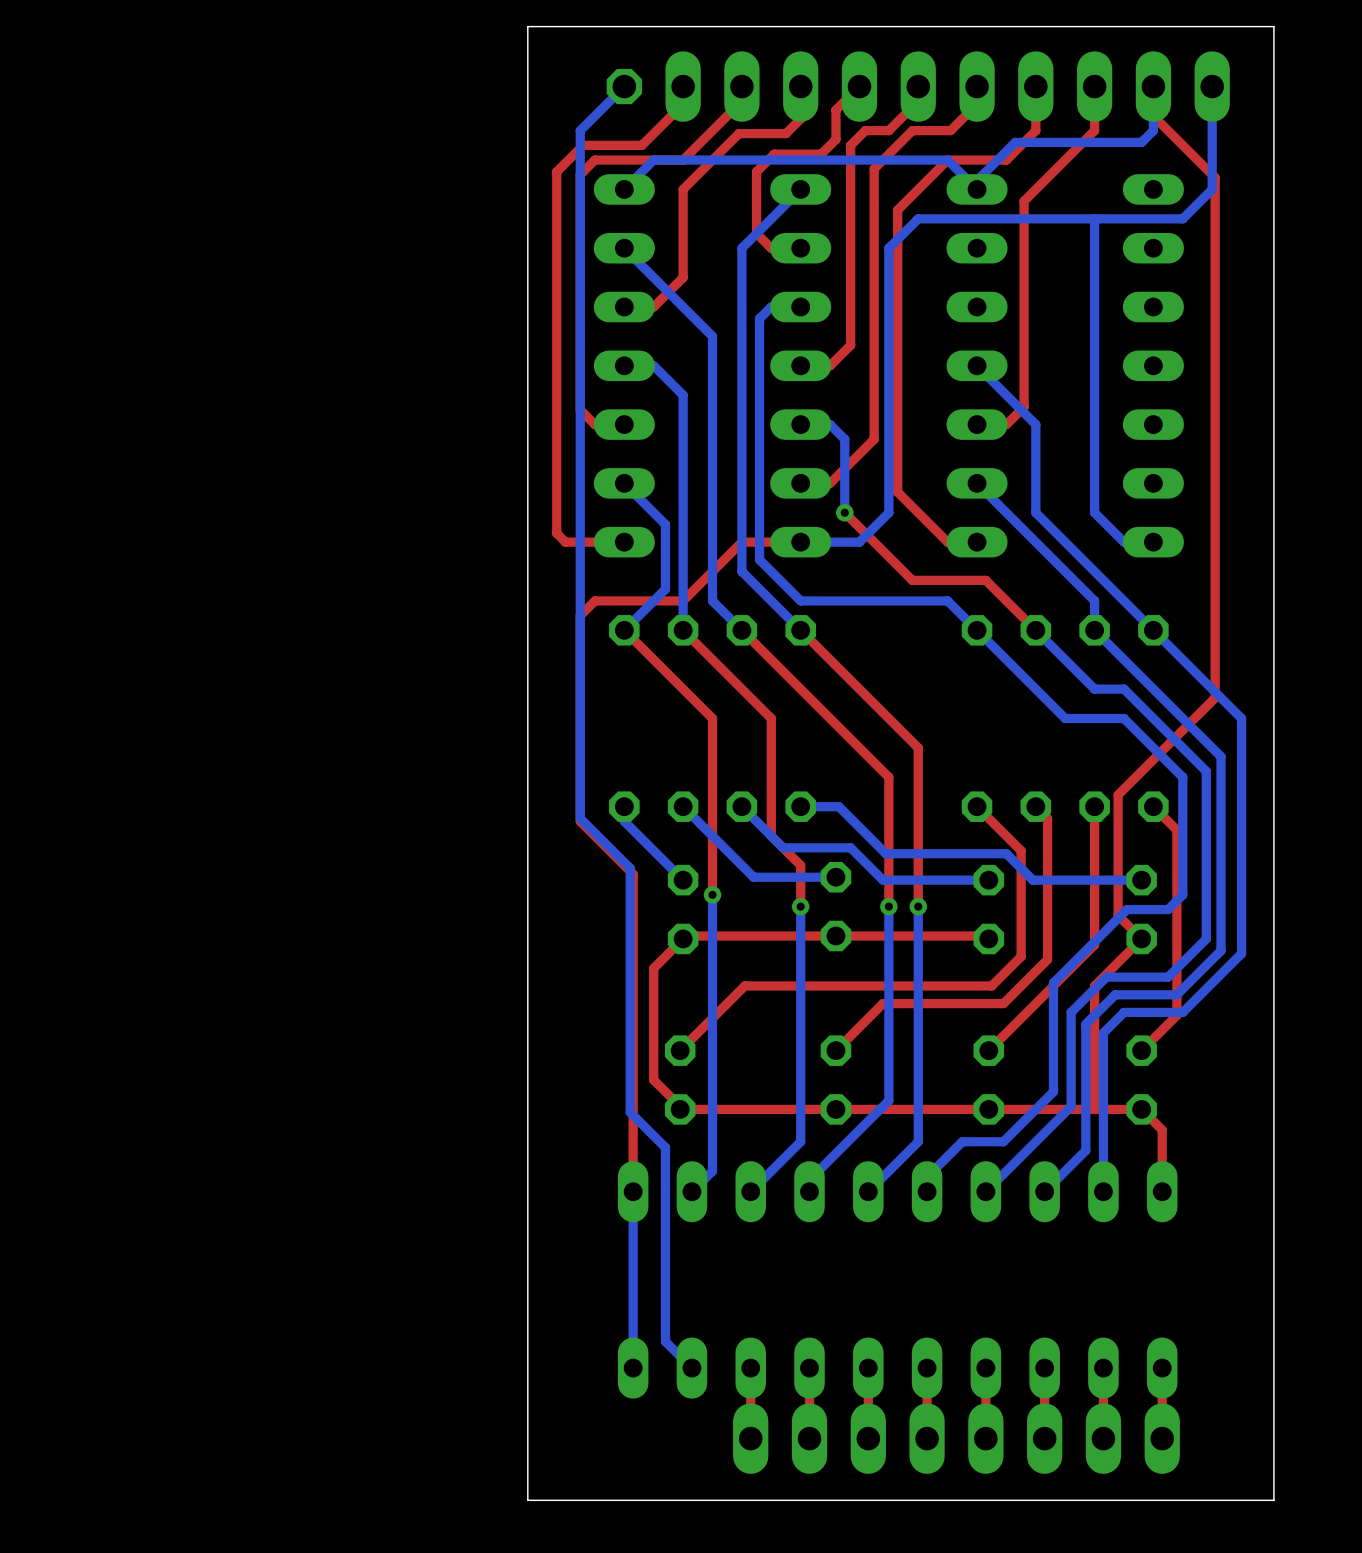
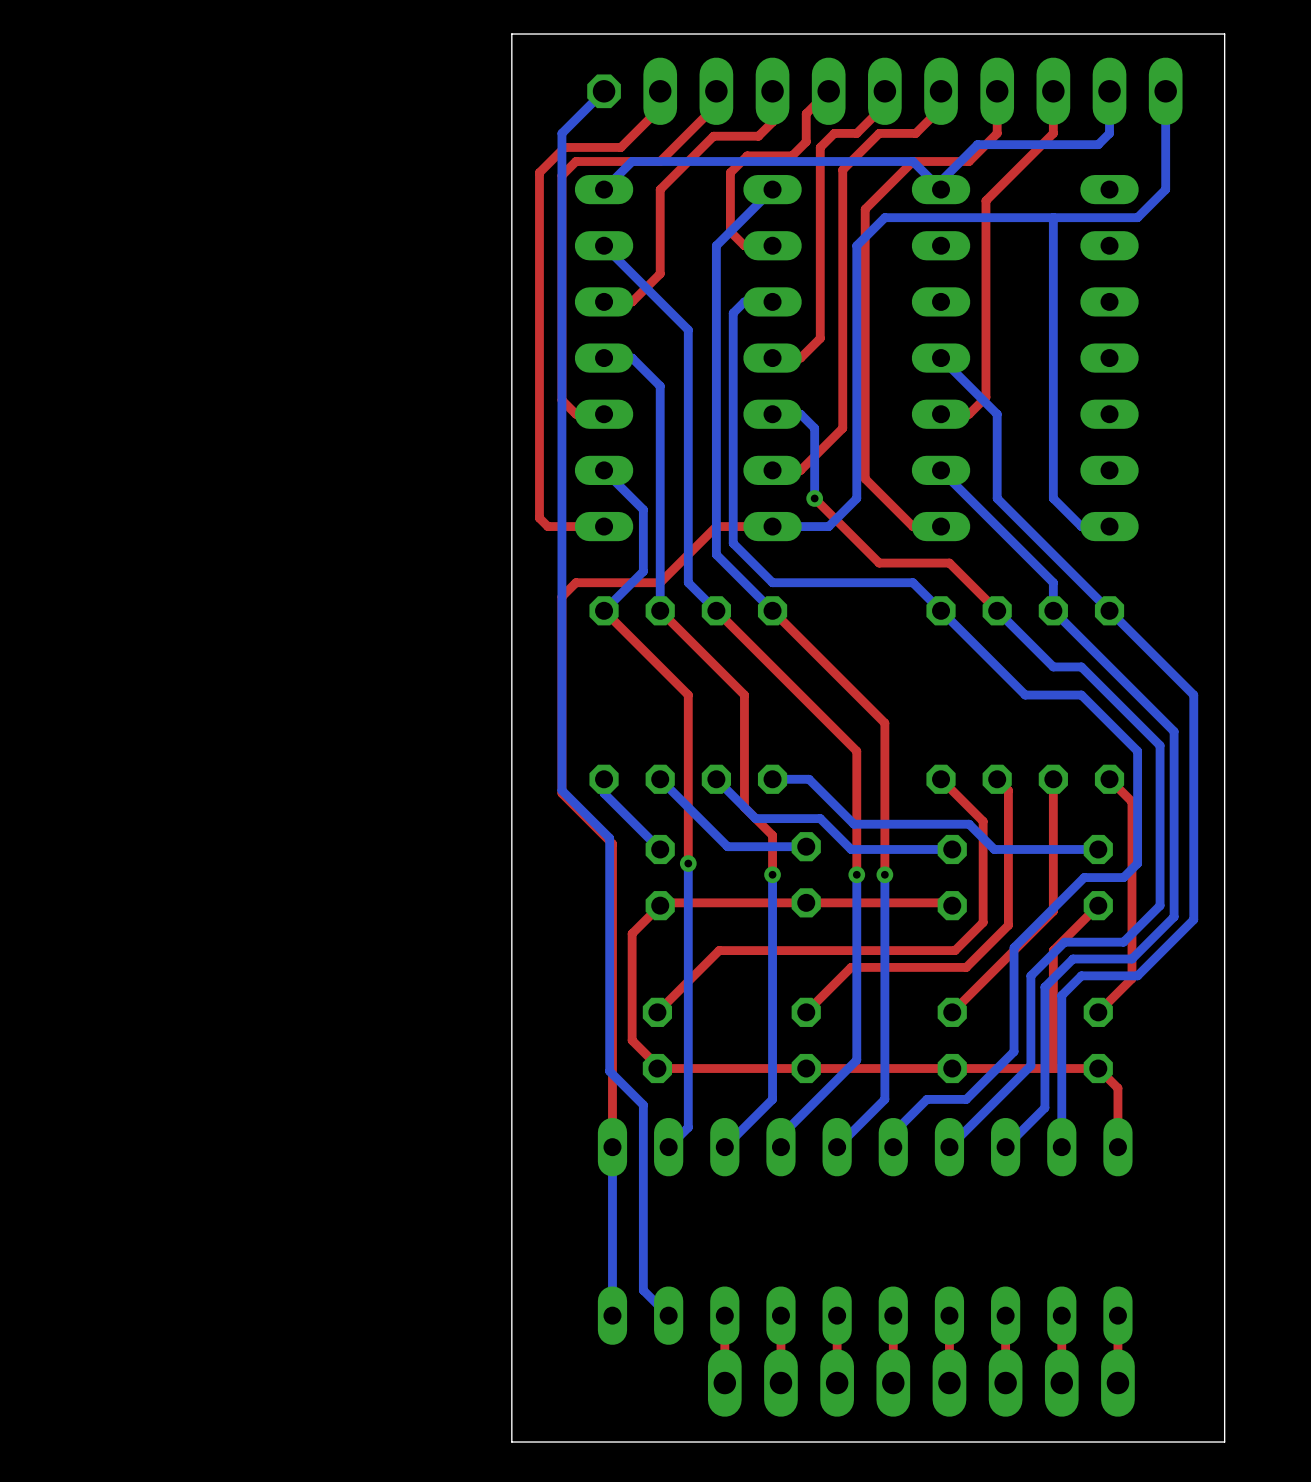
top track: (1153, 86) (1153, 115) (1215, 177) (1215, 697) (1118, 794) (1118, 915) (1141, 938) -> none

